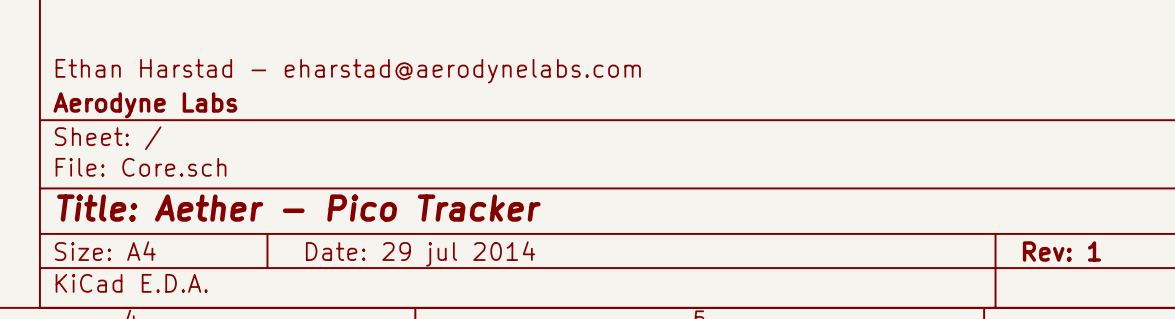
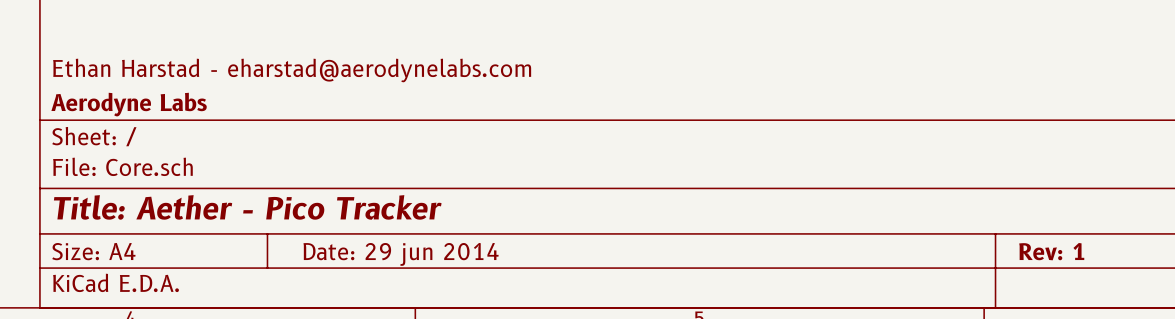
title block: Date: 29 jul 2014 (420, 253) -> Date: 29 jun 2014 (401, 254)

